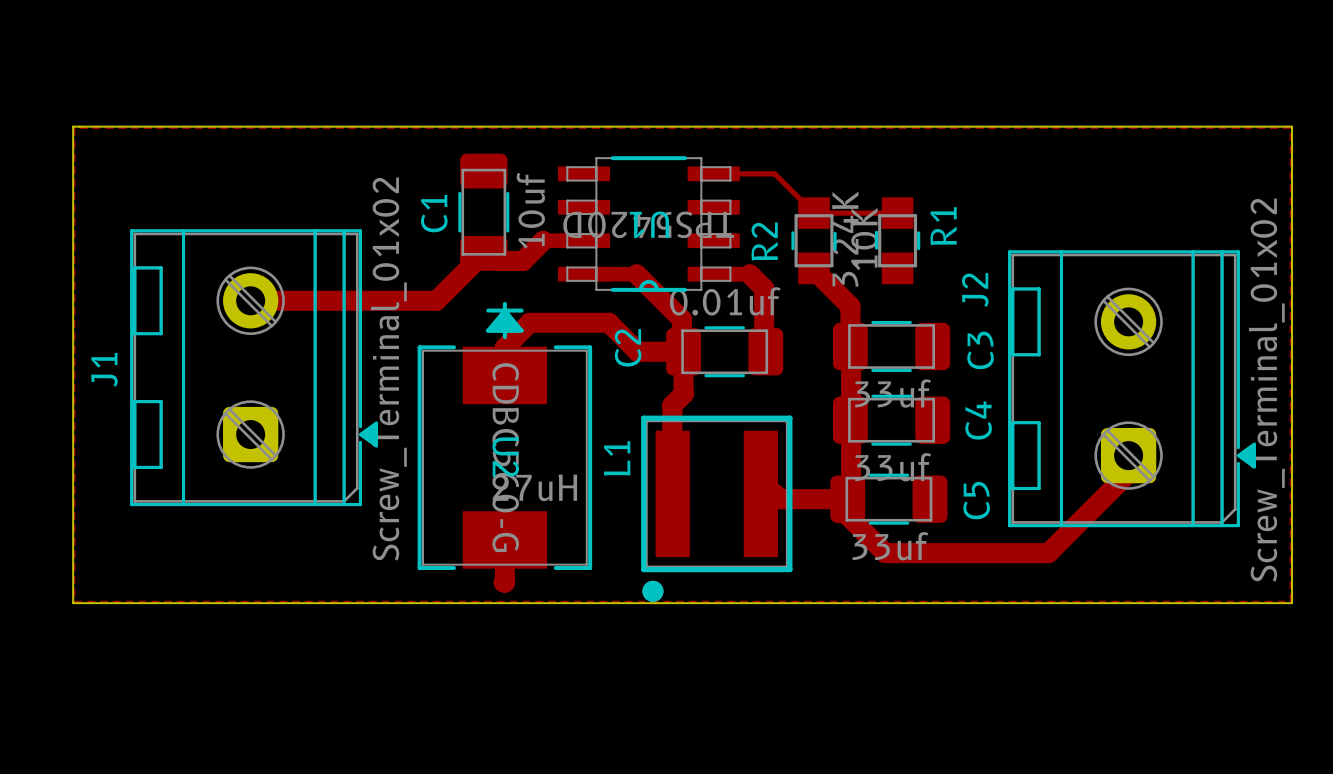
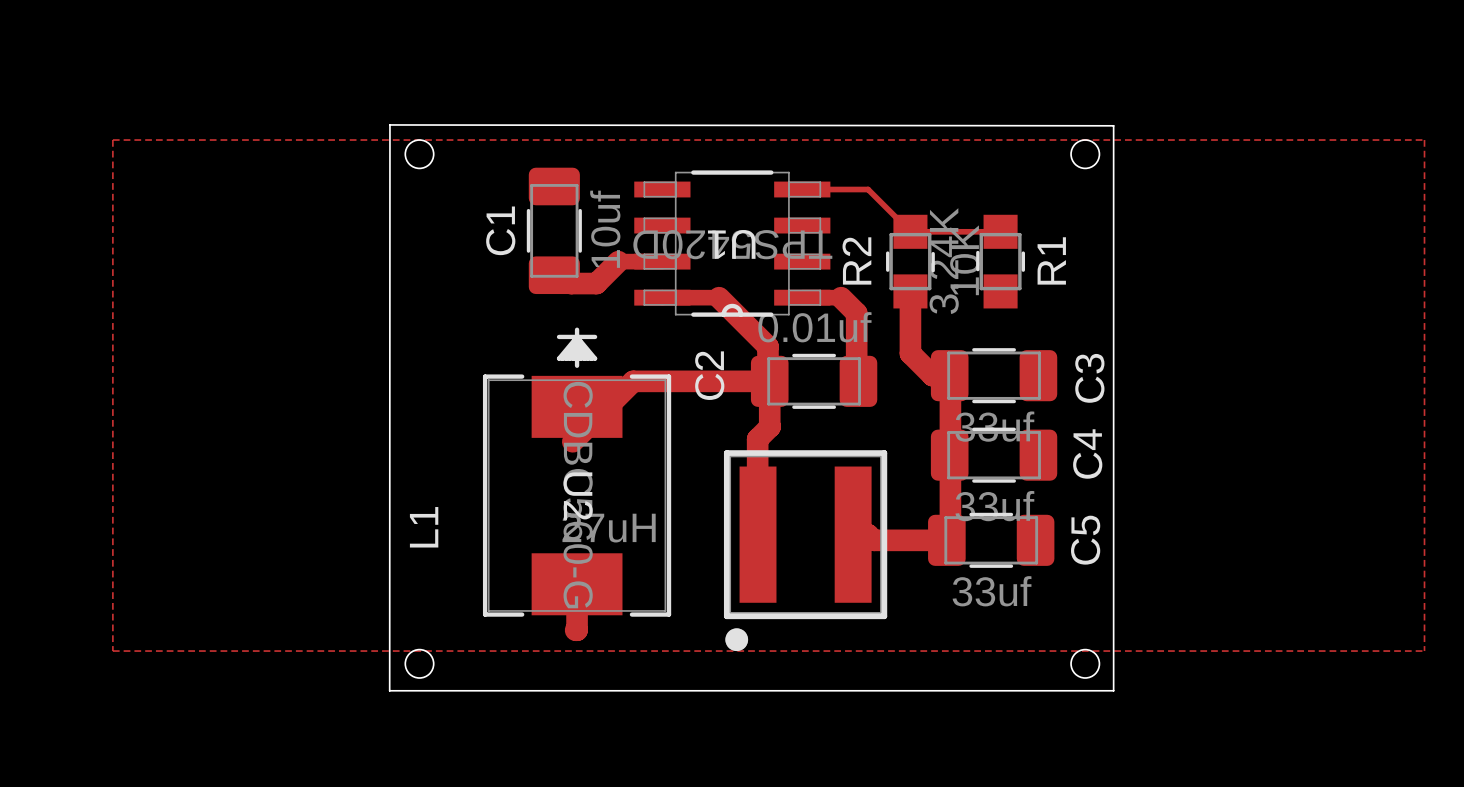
board edge: (73, 126) (1292, 126) (1292, 603) (73, 603) (73, 126) -> (389, 124) (389, 690) (1113, 690) (1113, 125) (389, 124)
round board edge: none -> [404, 139, 435, 170]
round board edge: none -> [1070, 139, 1101, 170]
R1 name position: R1 (943, 226) -> R1 (1051, 260)
track: (483, 253) (436, 300) (250, 300) -> none
track: (814, 269) (850, 306) (850, 346) -> (910, 293) (910, 353) (932, 375) (949, 375)
track: (637, 351) (608, 322) (529, 322) (504, 347) (504, 386) -> (720, 381) (633, 381) (572, 441)
J1: Screw_Terminal_01x02 (254, 367) -> none
J2: Screw_Terminal_01x02 (1132, 388) -> none
track: (1128, 455) (1128, 473) (1048, 553) (885, 553) (847, 515) (847, 499) -> none
L1 name position: L1 (617, 458) -> L1 (424, 527)
round board edge: none -> [404, 648, 435, 679]
round board edge: none -> [1070, 648, 1101, 679]

